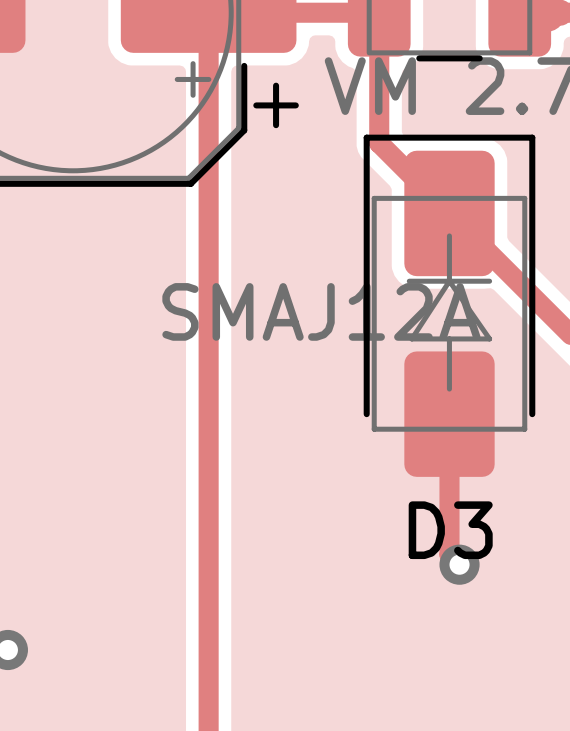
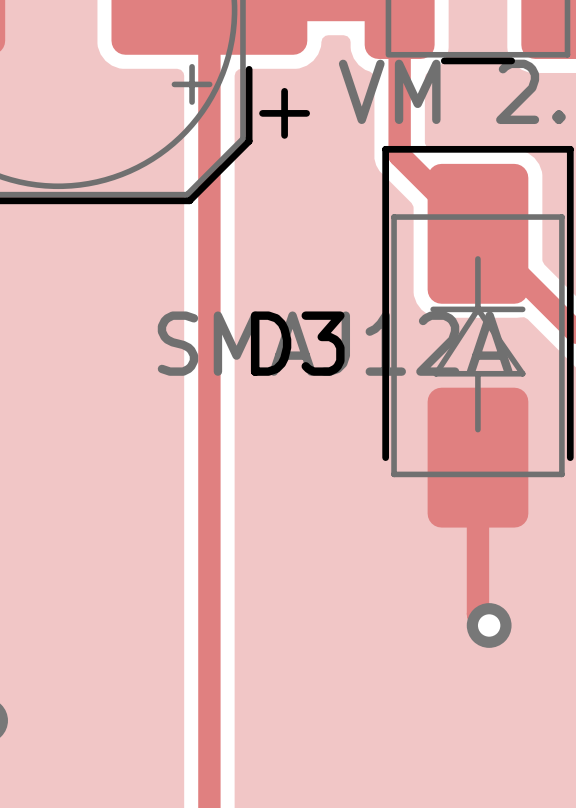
D3 name position: D3 (450, 530) -> D3 (297, 343)

